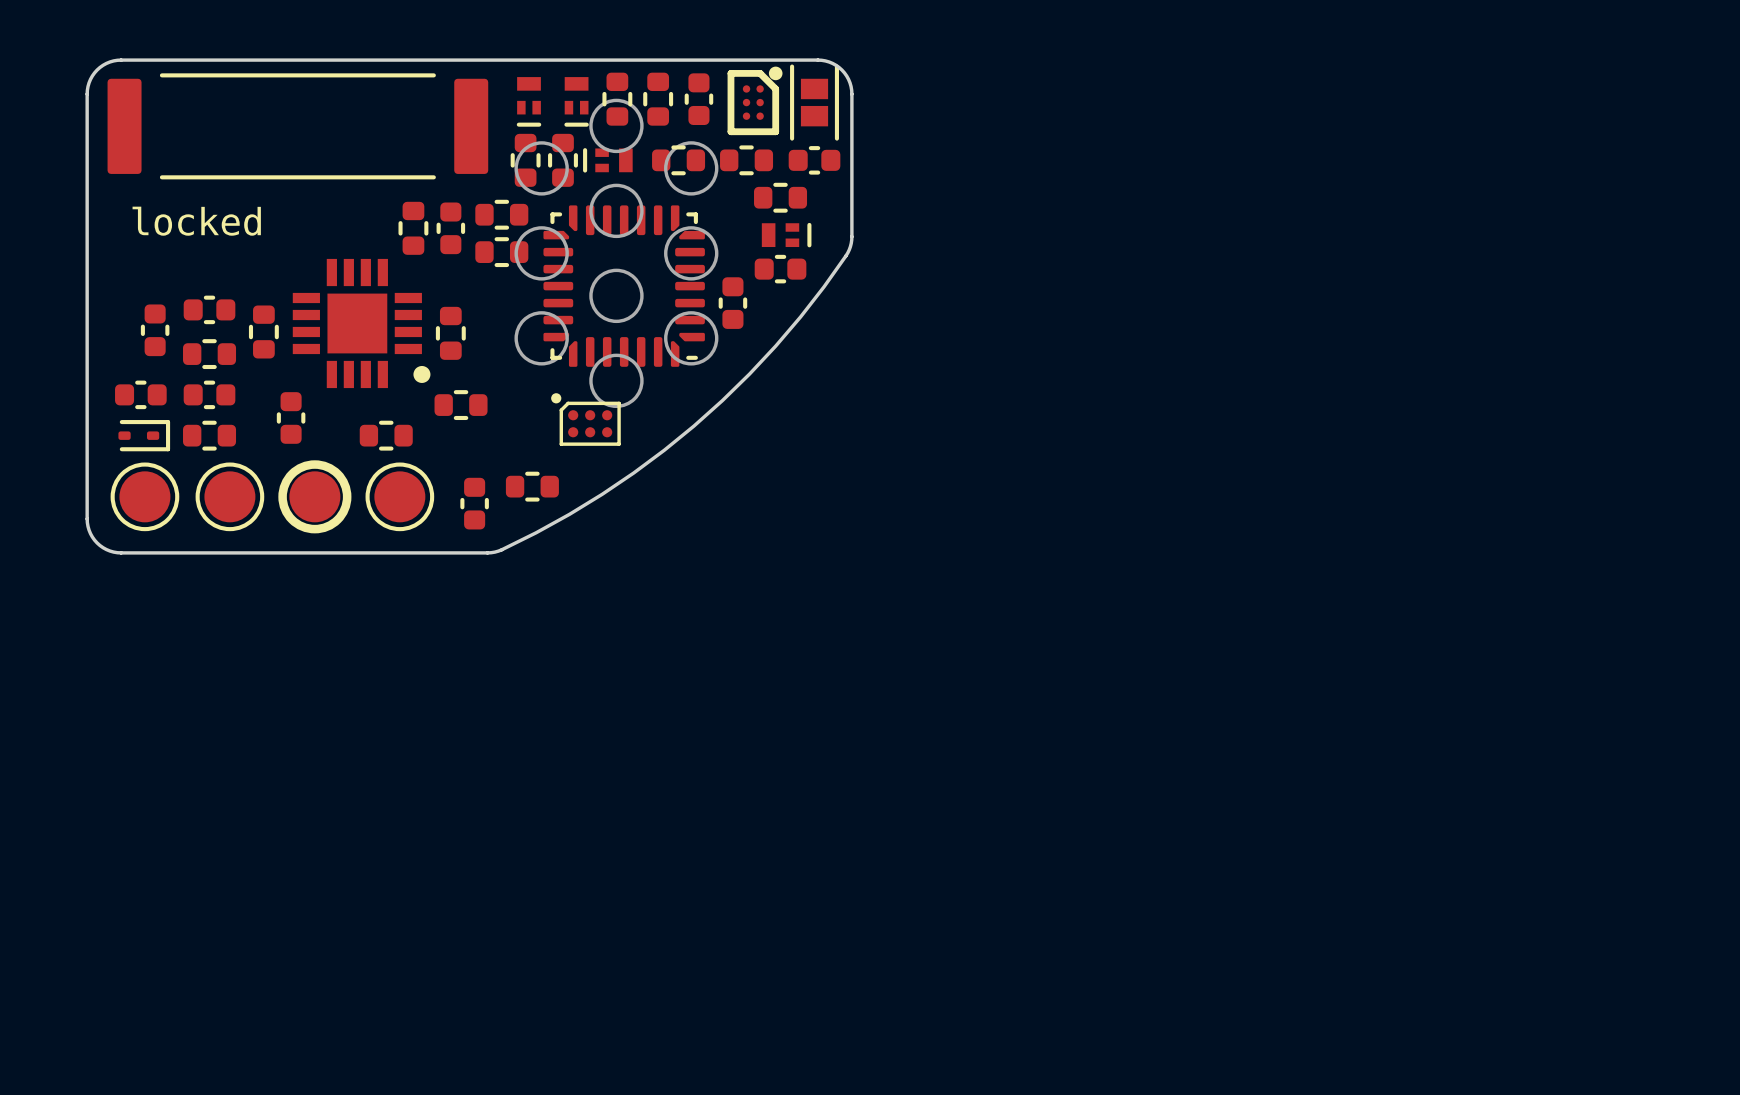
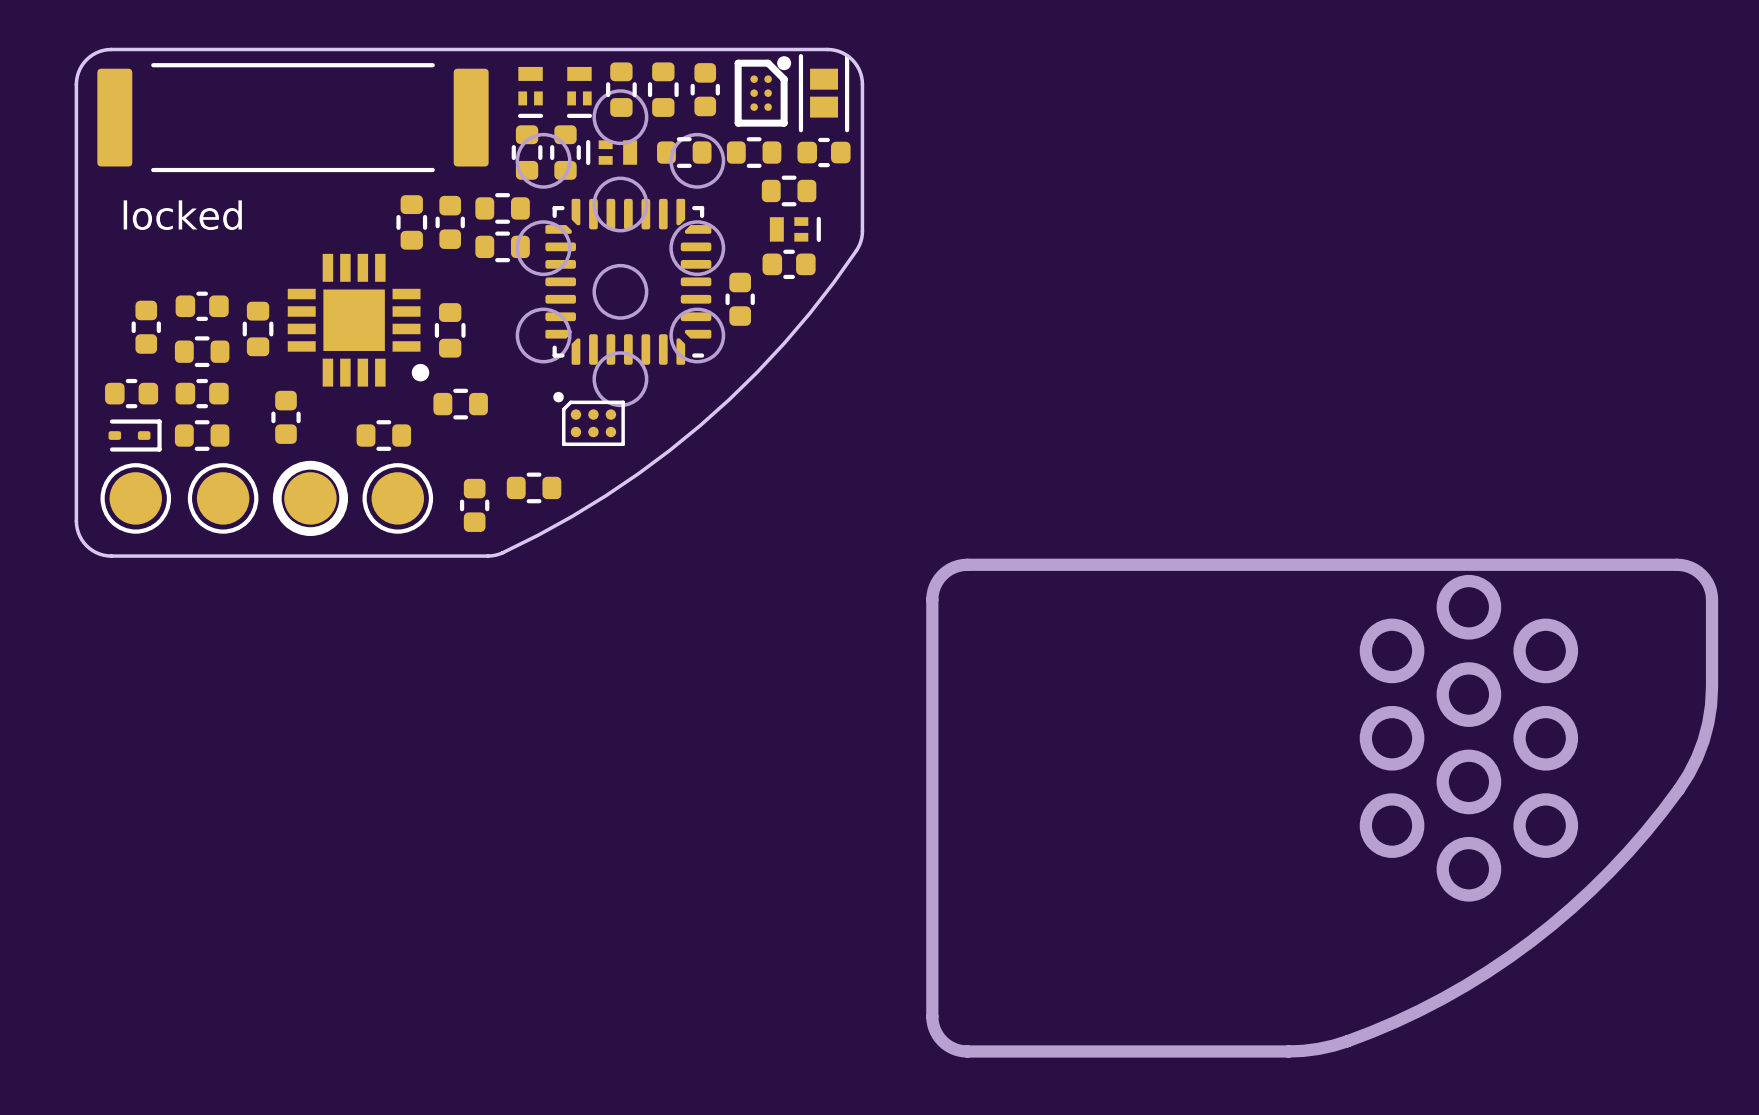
line: none -> (967, 564) (1686, 565) (1694, 569) (1704, 578) (1711, 595) (1712, 687) (1708, 723) (1697, 757) (1679, 789) (1645, 831) (1591, 890) (1551, 925) (1487, 971) (1442, 998) (1396, 1021) (1347, 1041) (1303, 1050) (959, 1050) (942, 1041) (935, 1031) (932, 1020) (932, 599) (934, 586) (942, 575) (953, 567) (967, 564)
drawing: none -> [1359, 574, 1579, 902]

